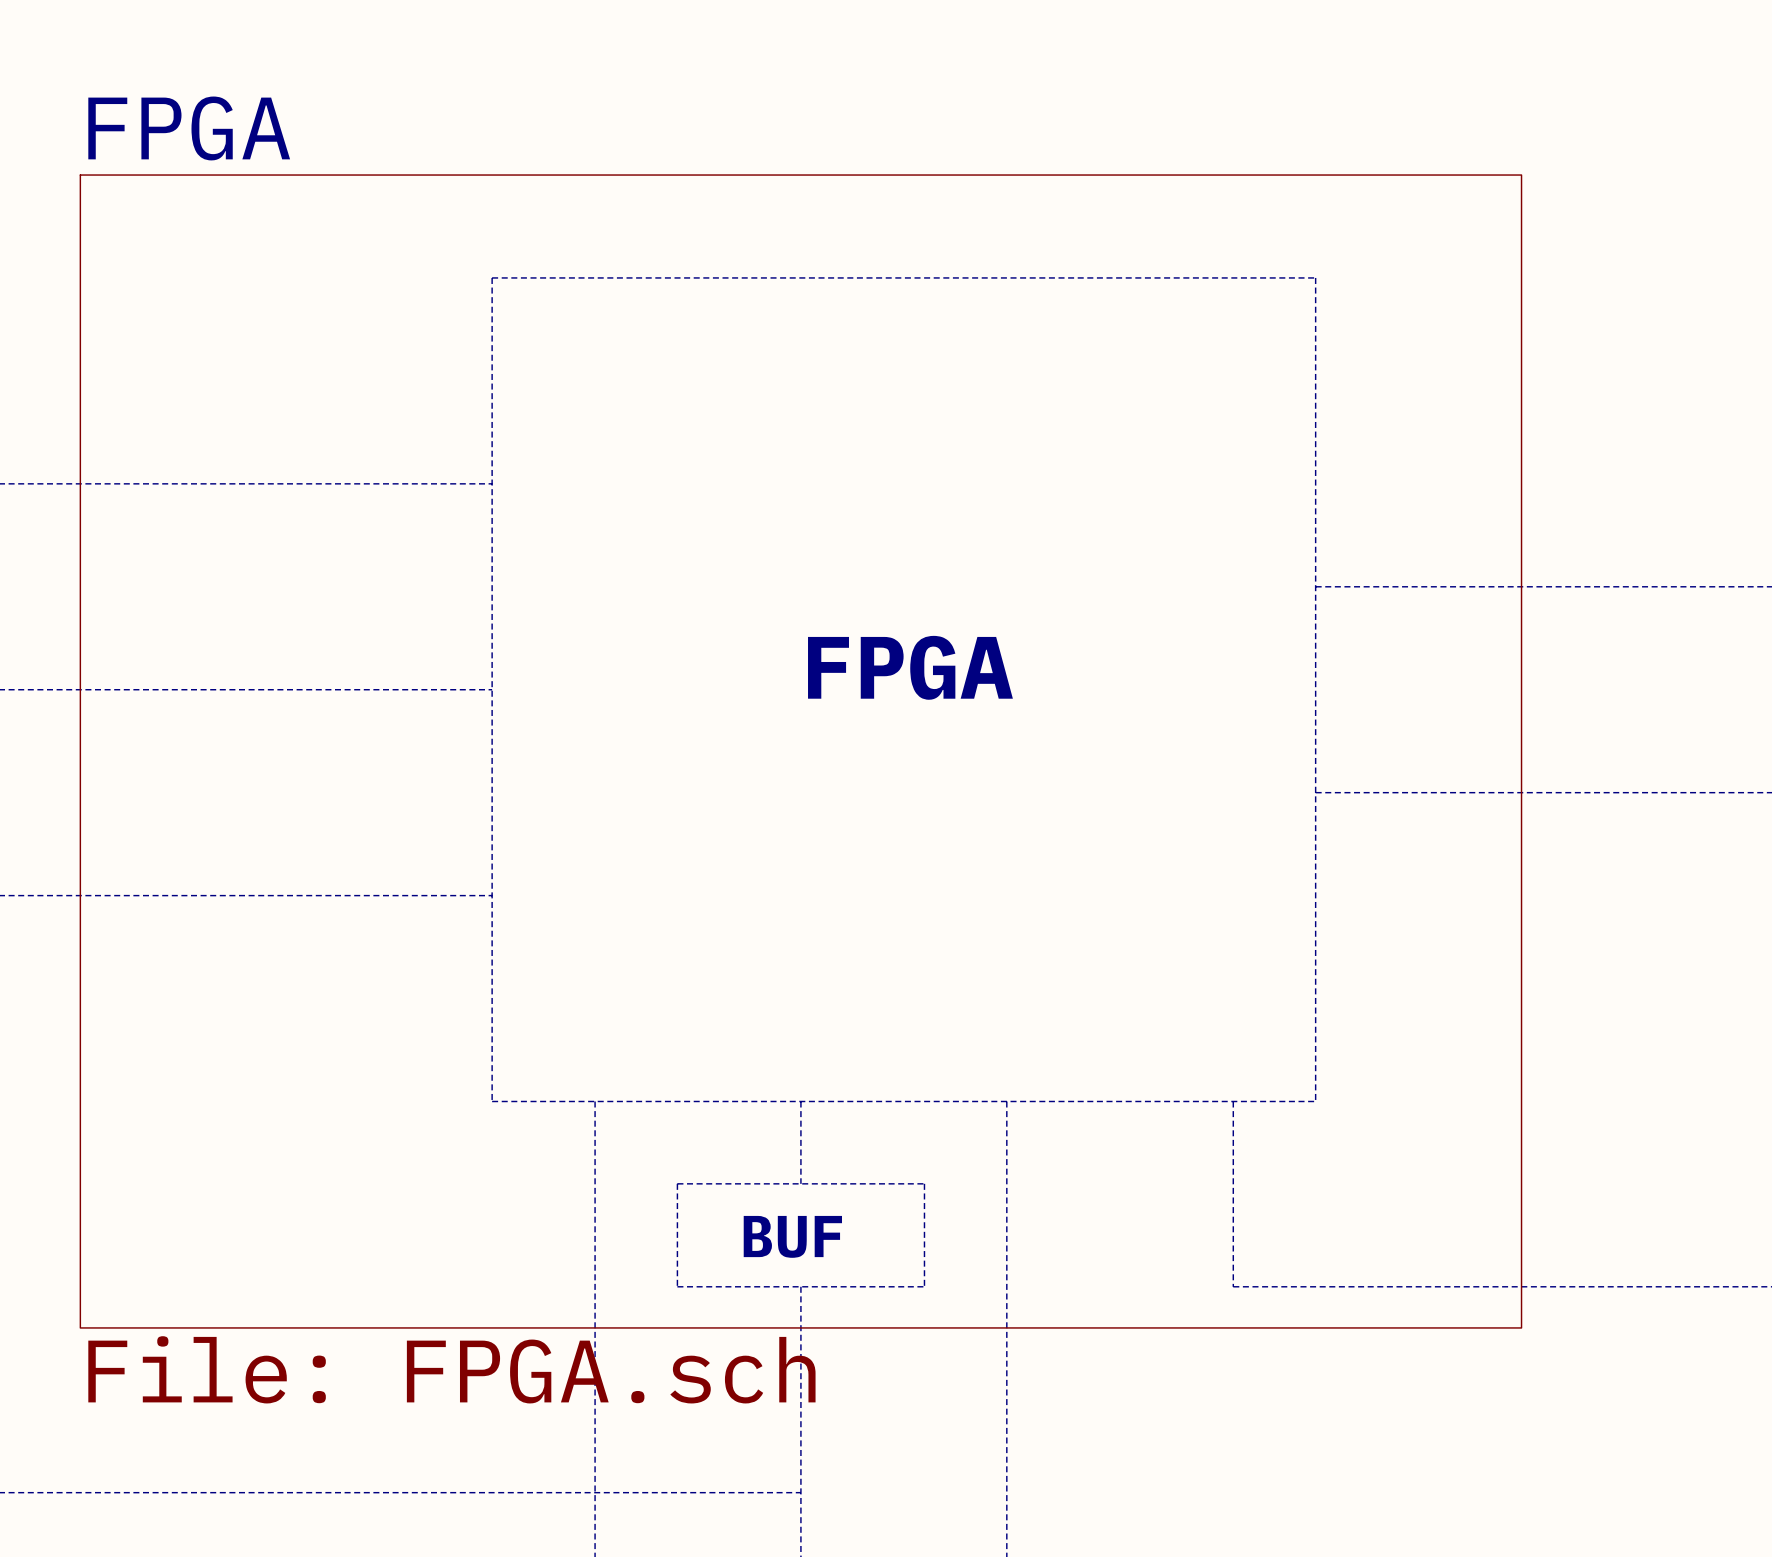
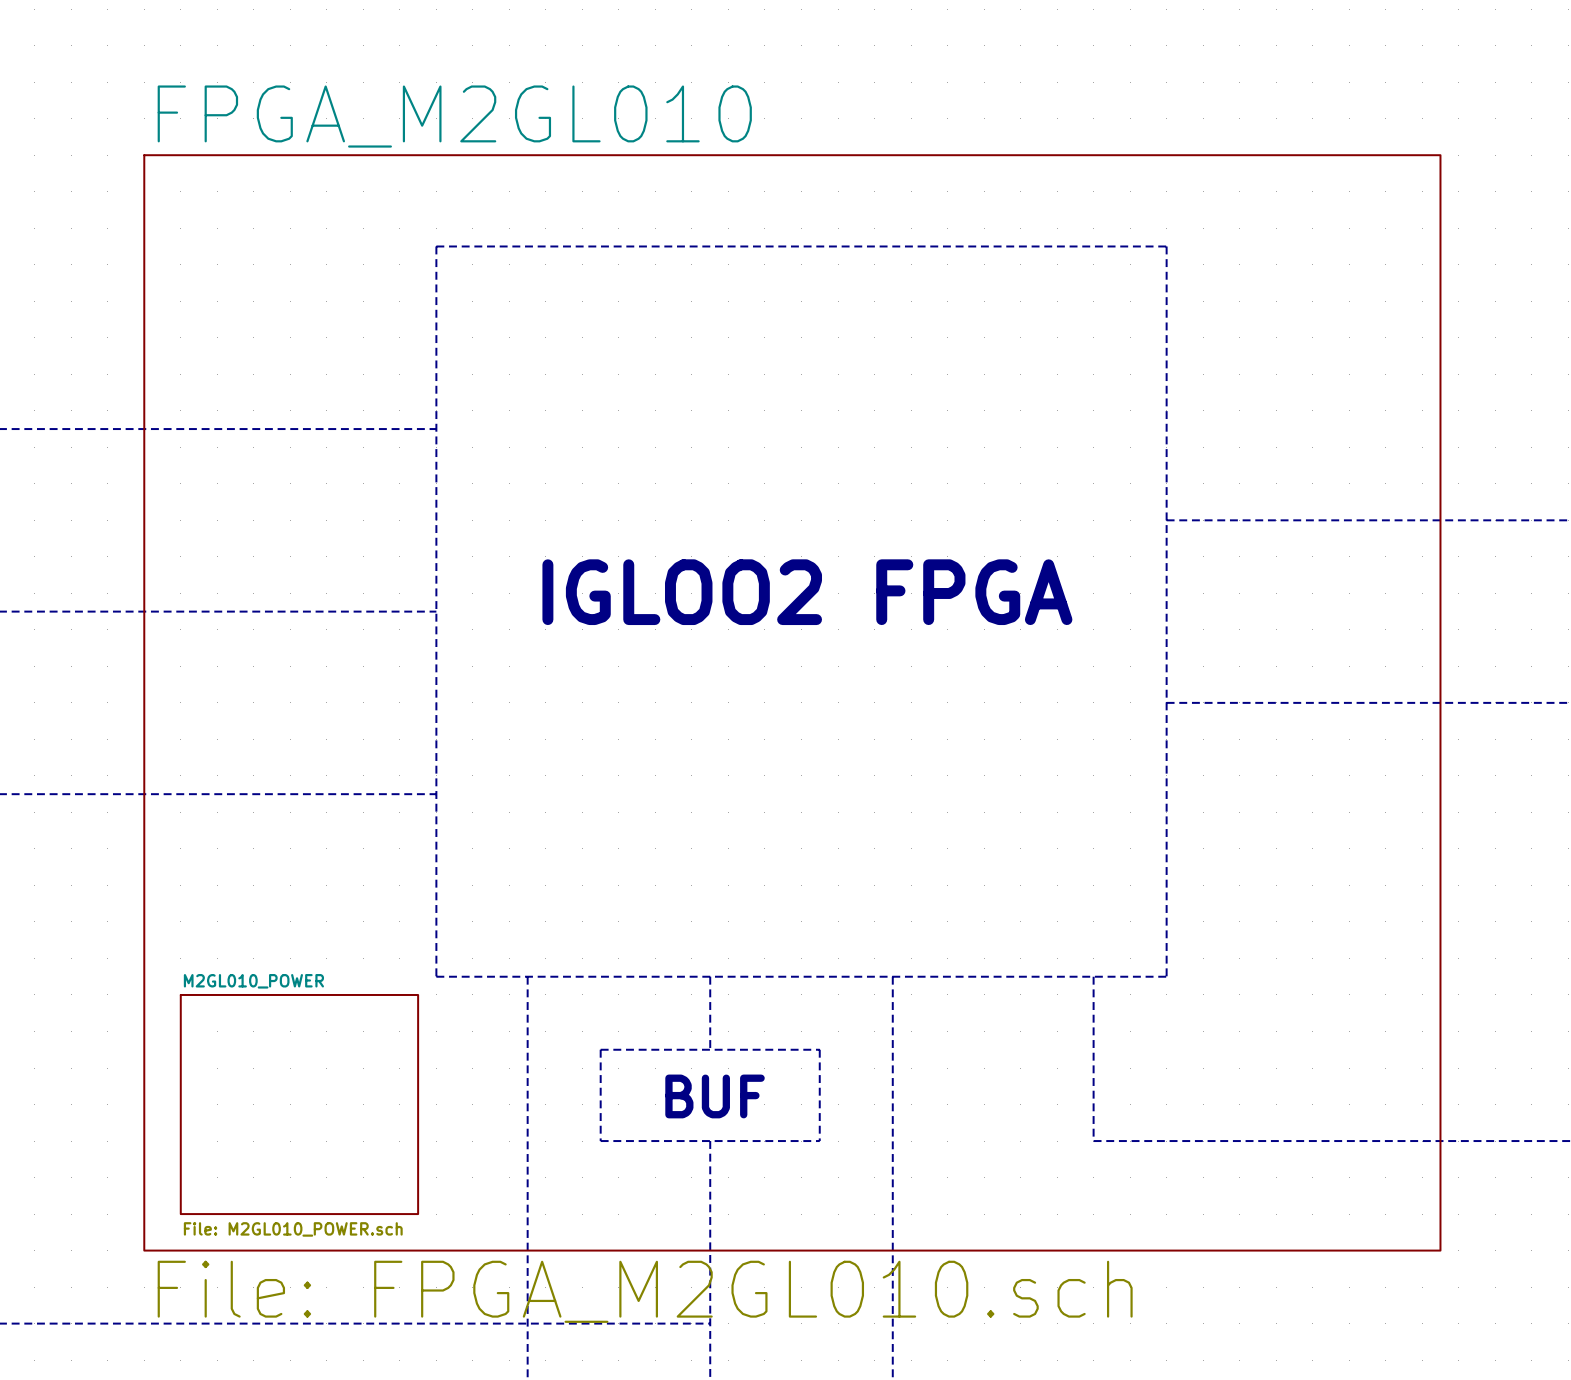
text: none -> IGLOO2 FPGA (807, 592)
text: FPGA (910, 667) -> none
sheet FPGA: File: FPGA.sch (800, 751) -> none
sheet FPGA_M2GL010: none -> File: FPGA_M2GL010.sch (792, 702)
sheet M2GL010_POWER: none -> File: M2GL010_POWER.sch (299, 1104)

